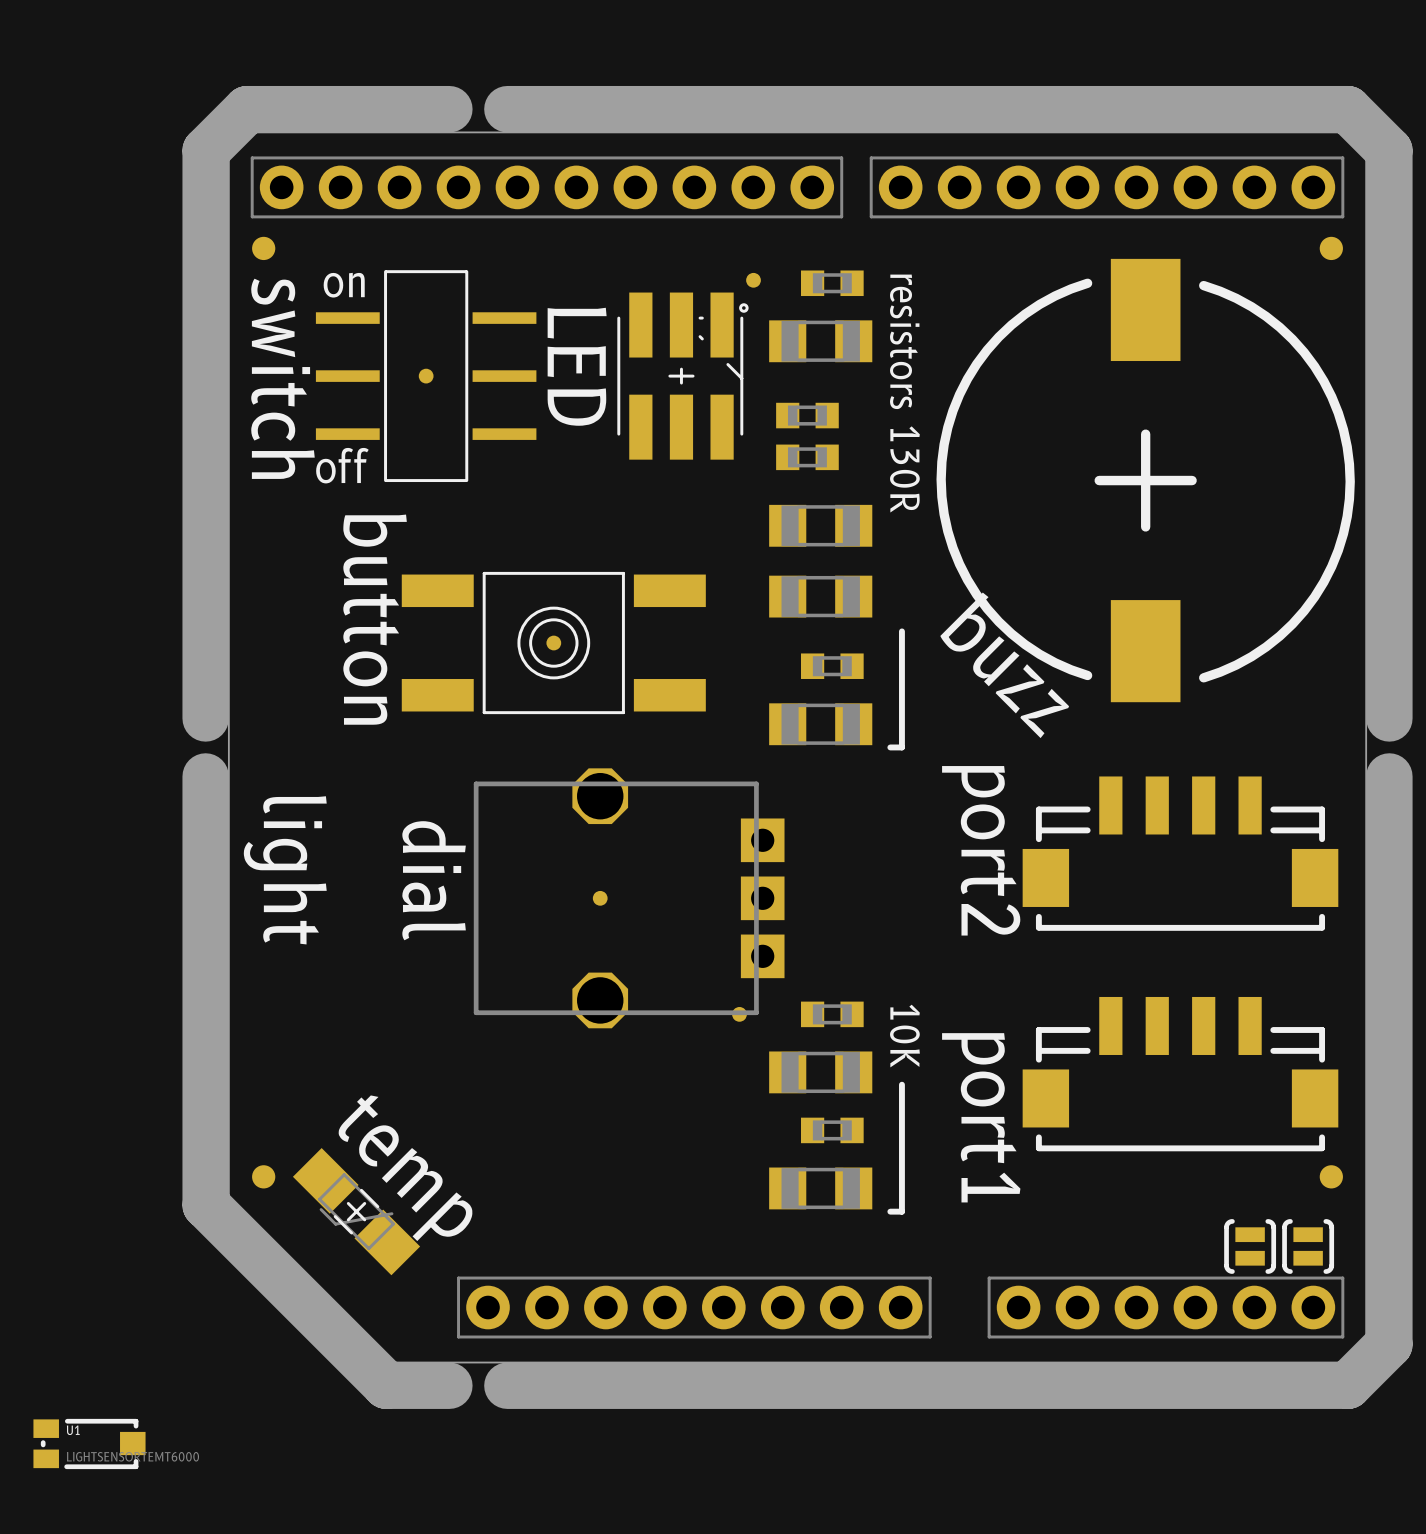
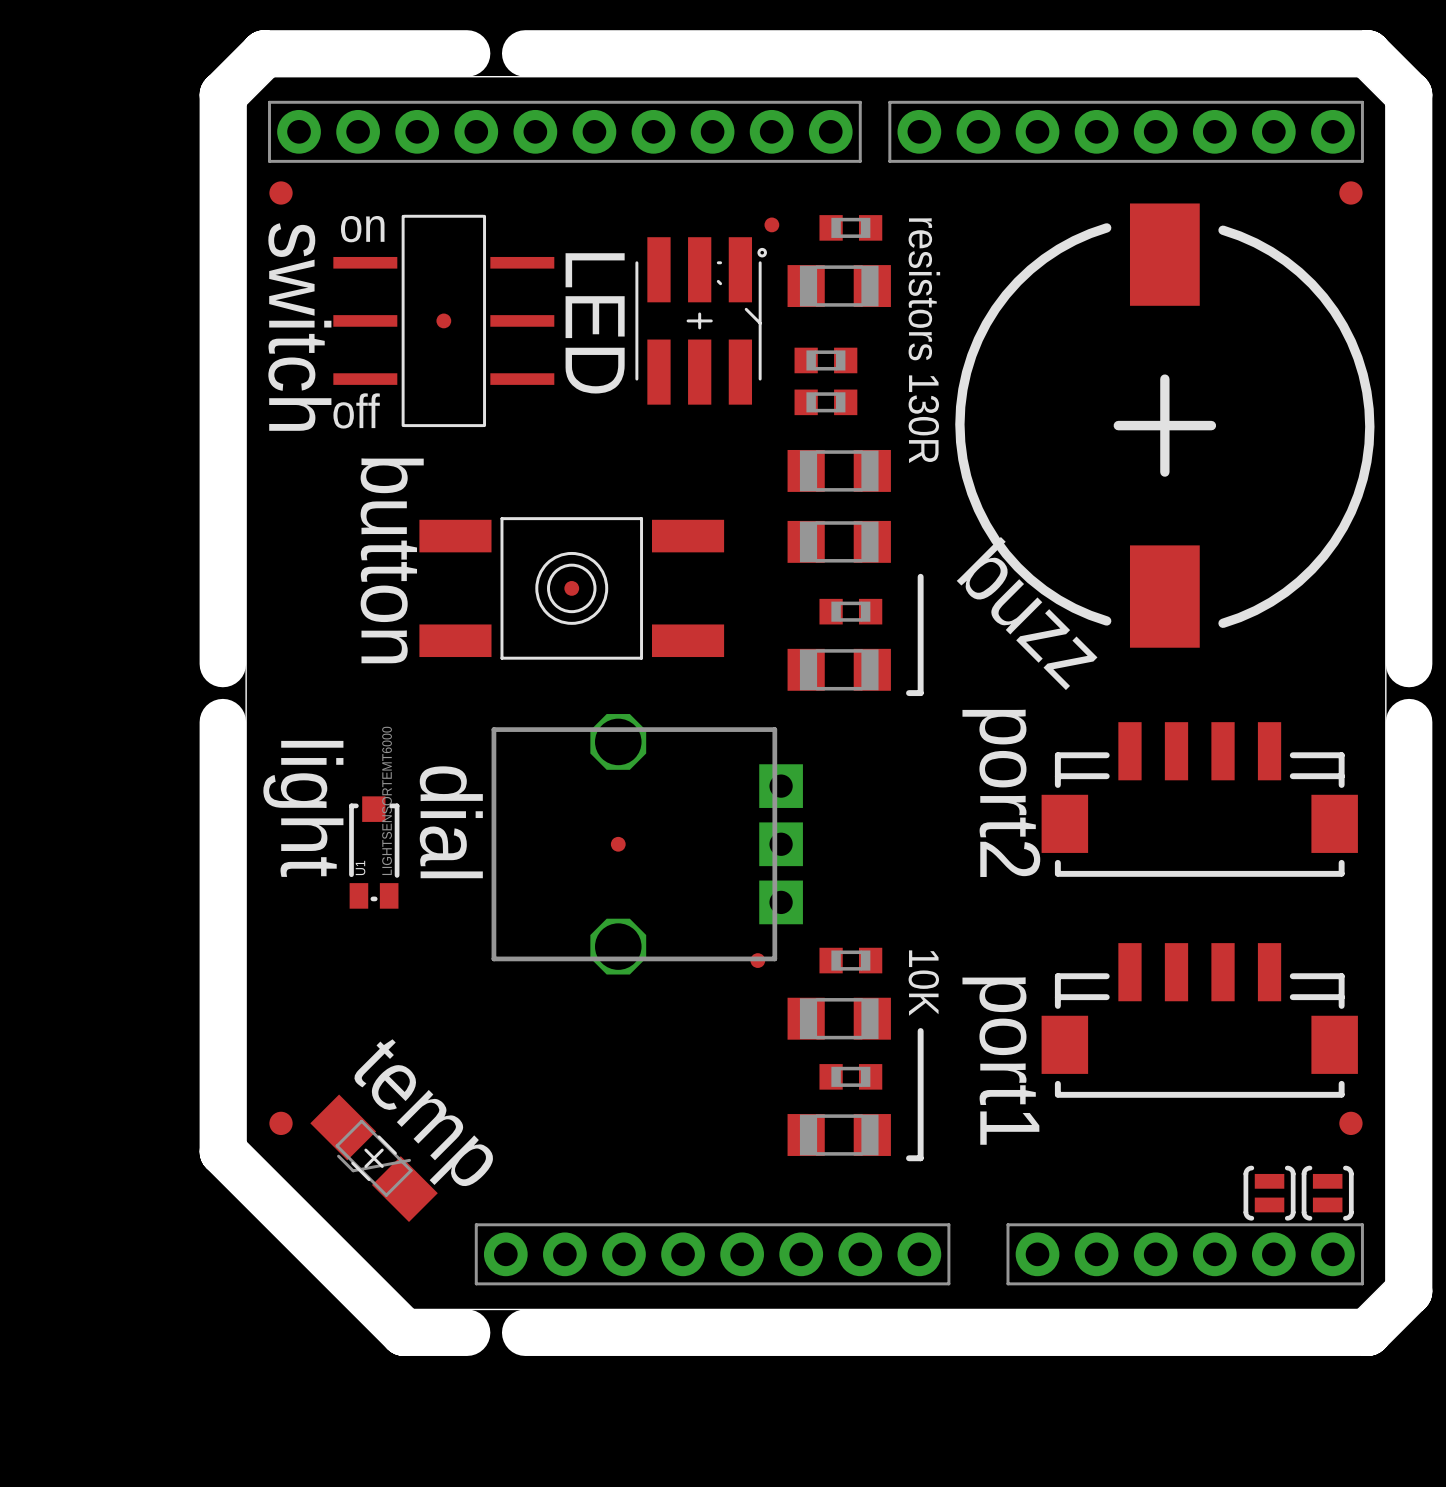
U1 rotation: 0° (89, 1443) -> 90° counterclockwise (374, 852)
U1 position: (89, 1443) -> (374, 852)

